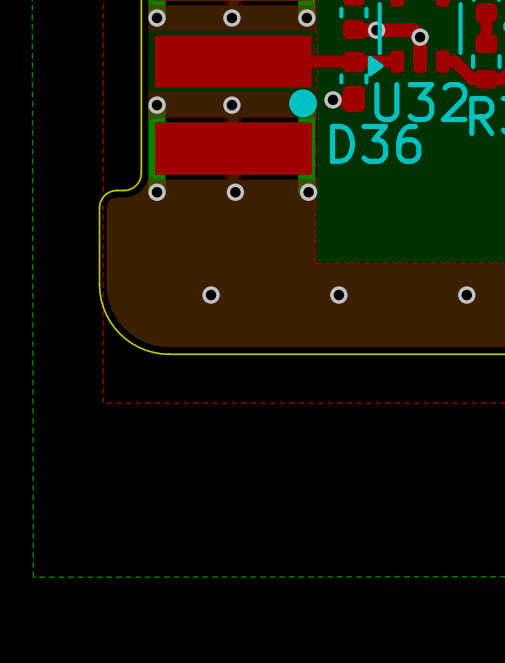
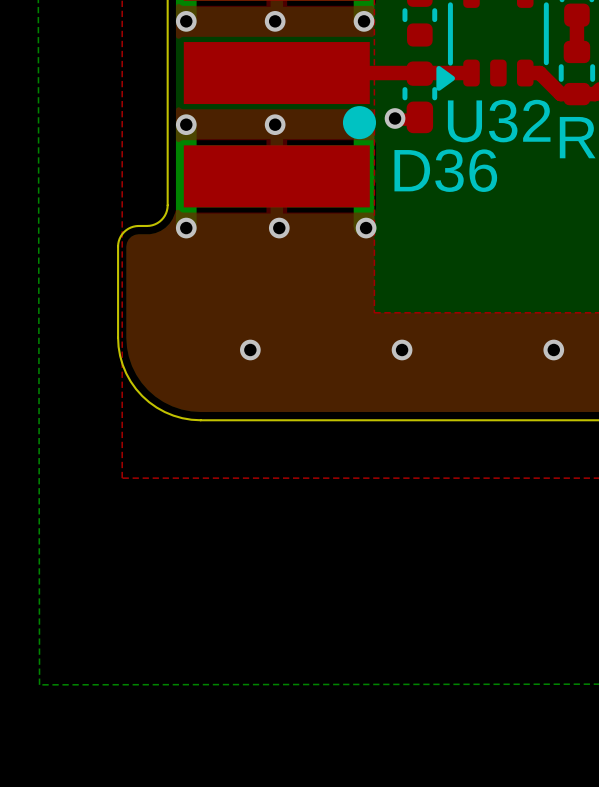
top track: (353, 29) (413, 30) (420, 37) (420, 61) -> none
via: (376, 30) -> none
via: (420, 37) -> none

